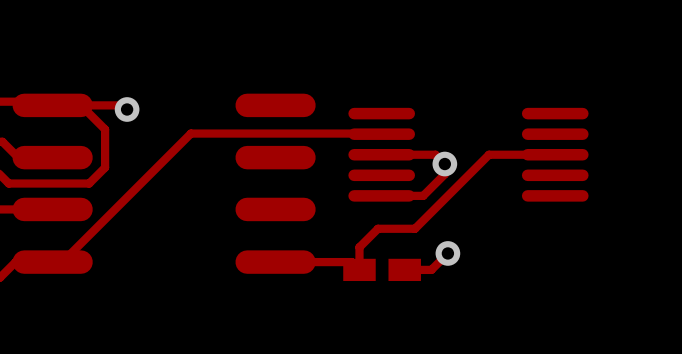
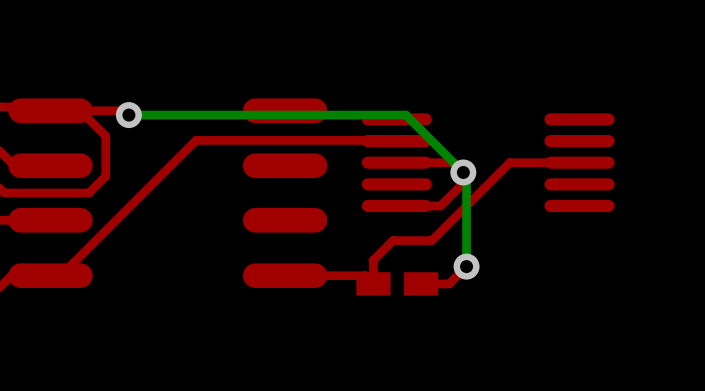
bottom track: none -> (128, 115) (405, 115) (466, 175) (466, 266)

